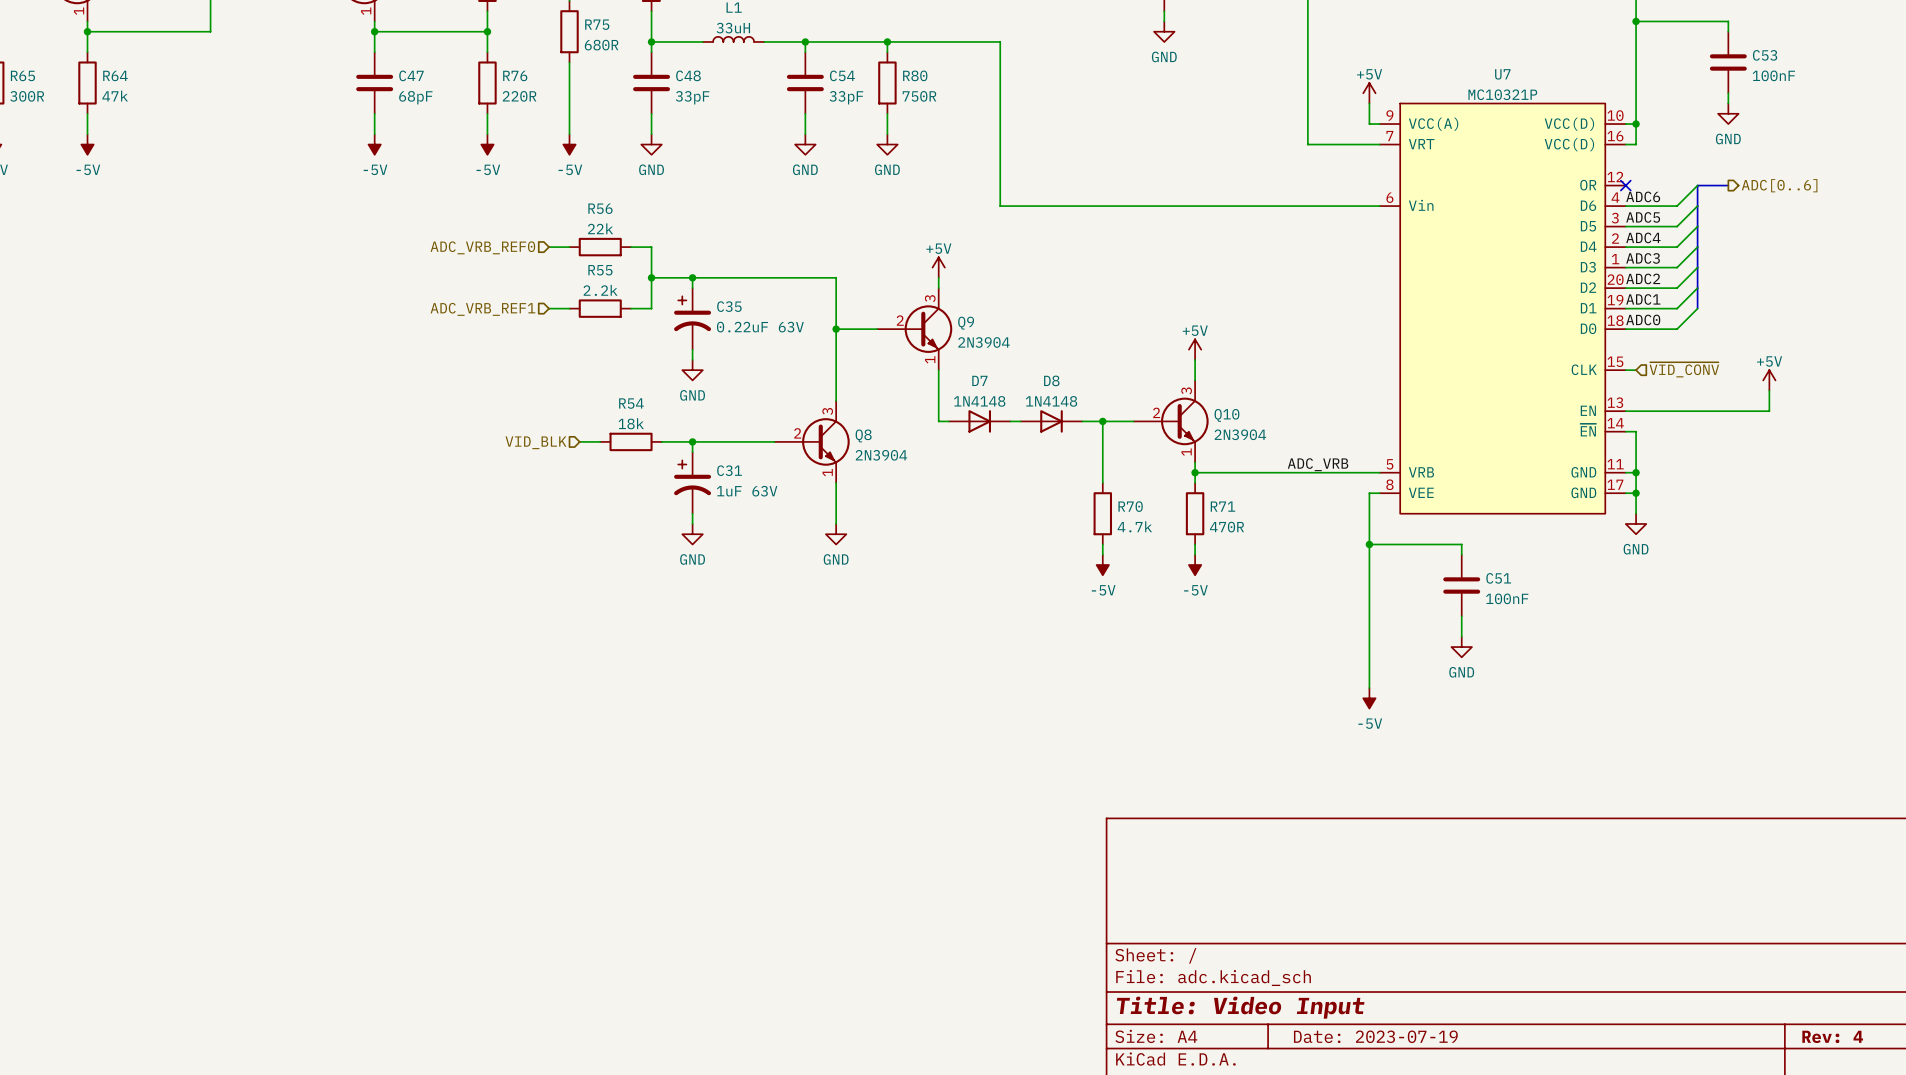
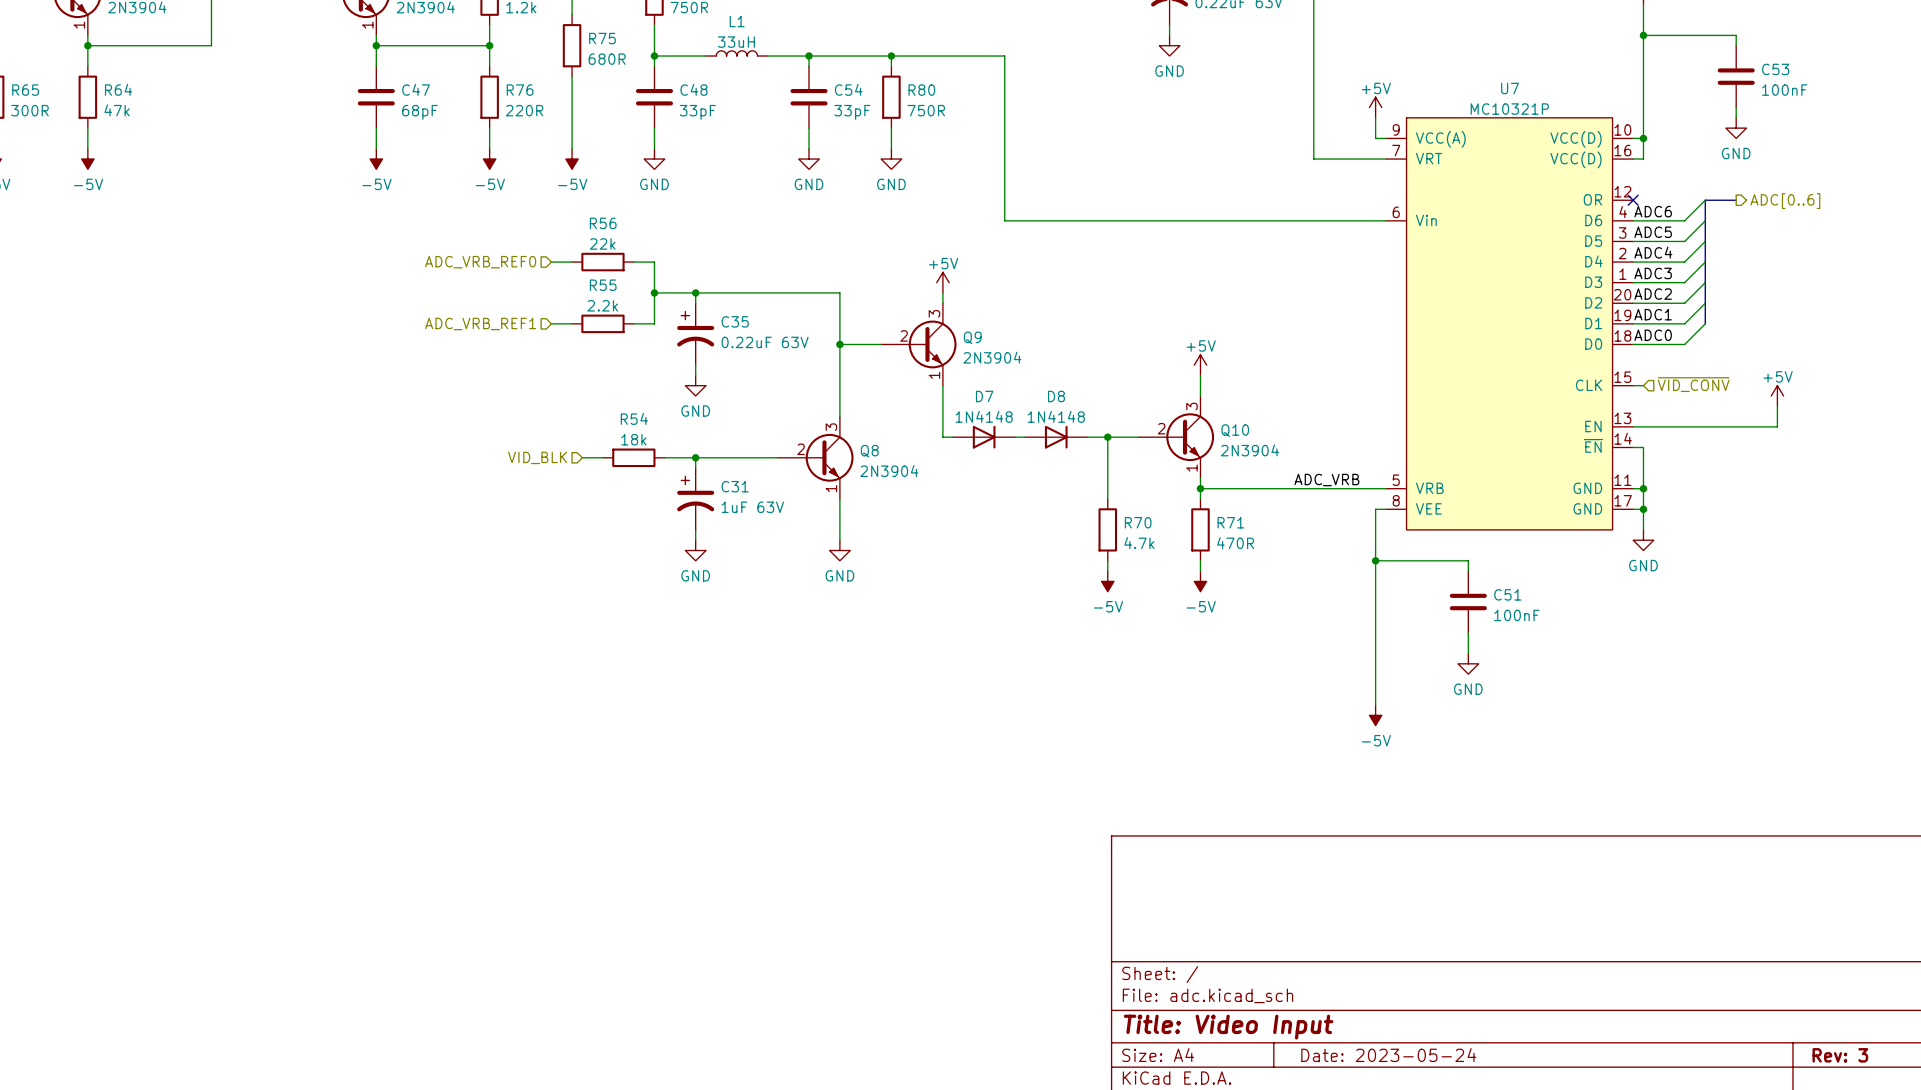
title block: Date: 2023-07-19 (1375, 1036) -> Date: 2023-05-24 (1388, 1055)
title block: Rev: 4 (1832, 1036) -> Rev: 3 (1840, 1055)

